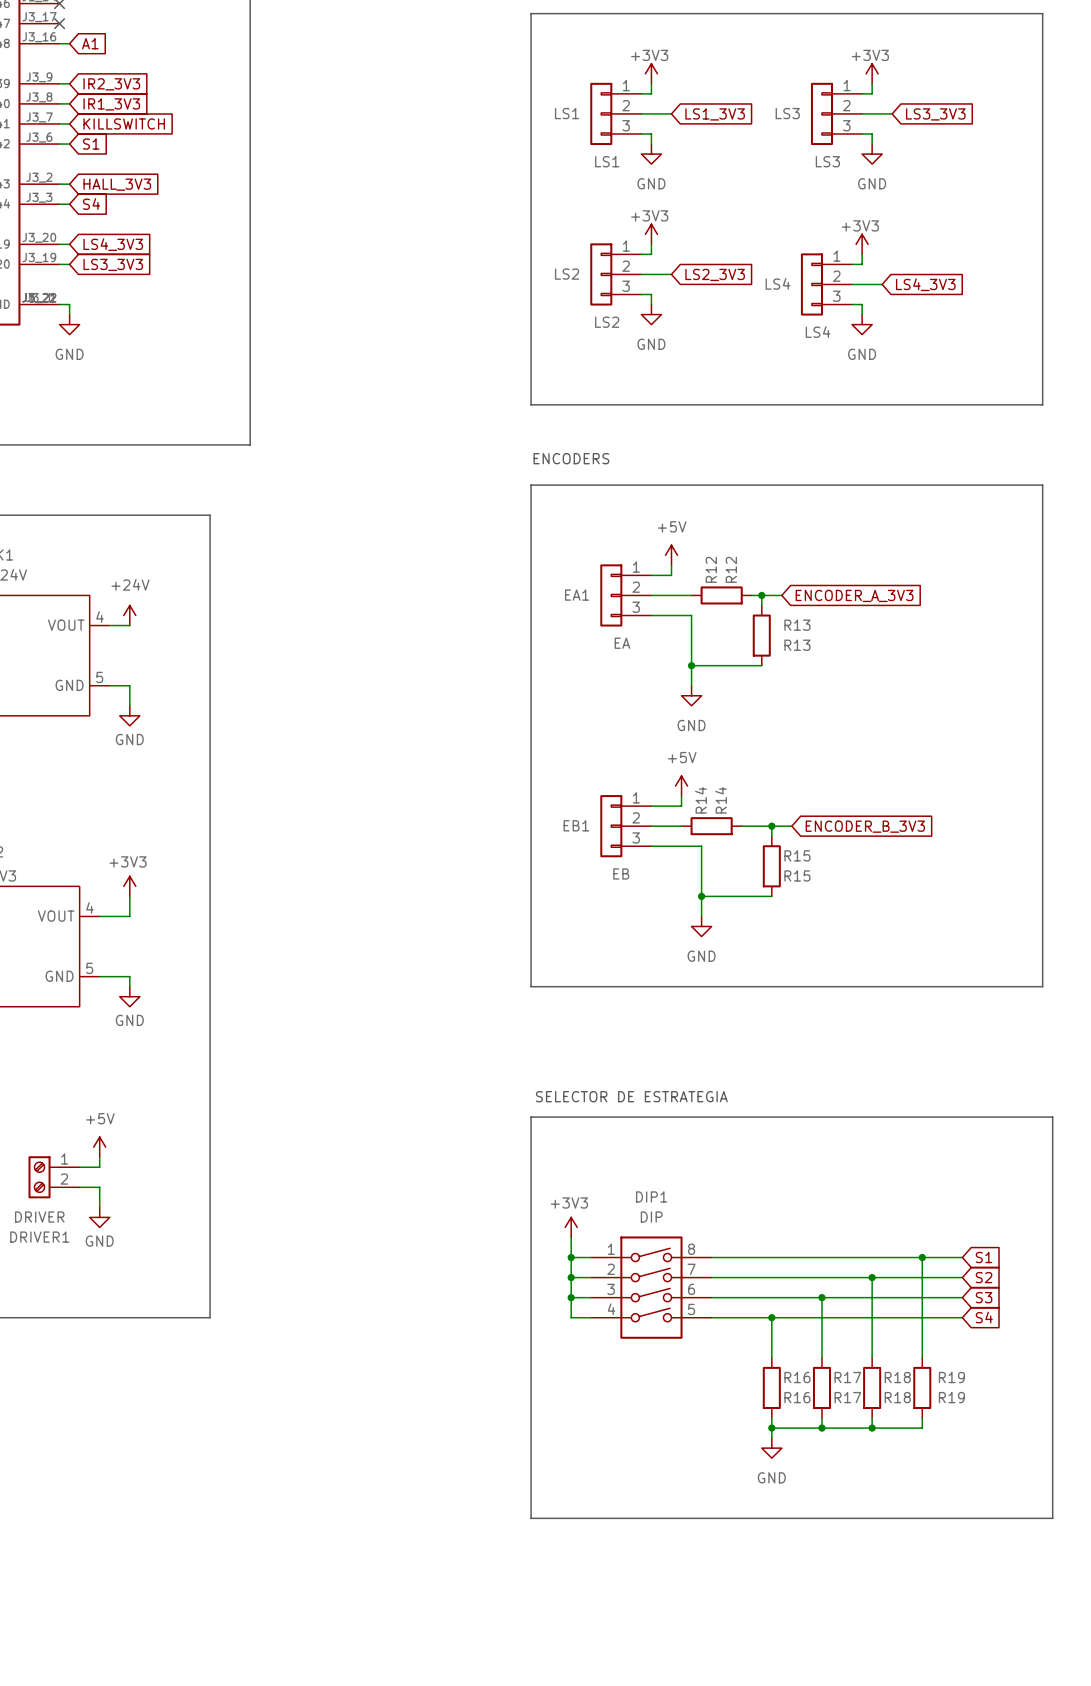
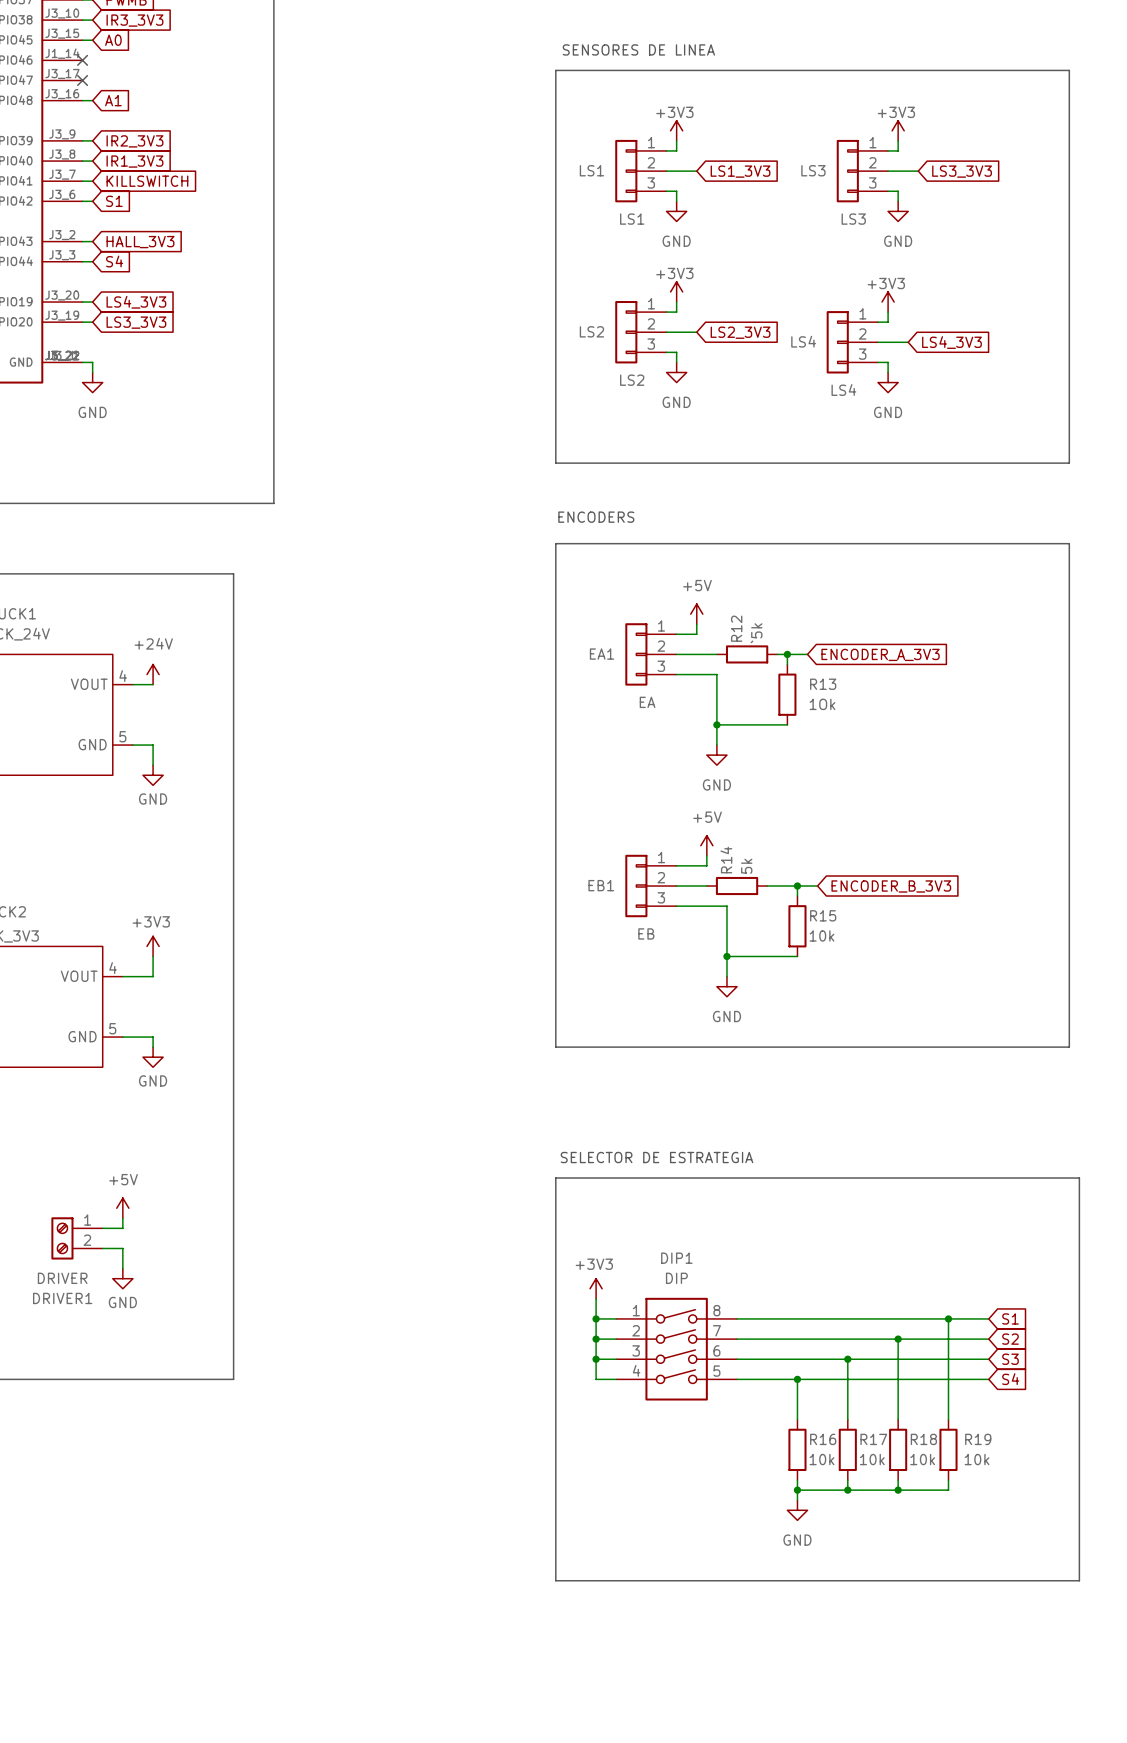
R12 value: R12 (731, 569) -> `5k (756, 633)
R13 value: R13 (797, 645) -> 1Ok (822, 704)
R14 value: R14 (721, 800) -> 5k (746, 866)
R15 value: R15 (797, 875) -> 10k (821, 935)
R16 value: R16 (797, 1397) -> 10k (821, 1459)
R17 value: R17 (847, 1397) -> 10k (872, 1459)
R18 value: R18 (897, 1397) -> 10k (922, 1459)
R19 value: R19 (951, 1397) -> 10k (977, 1459)

